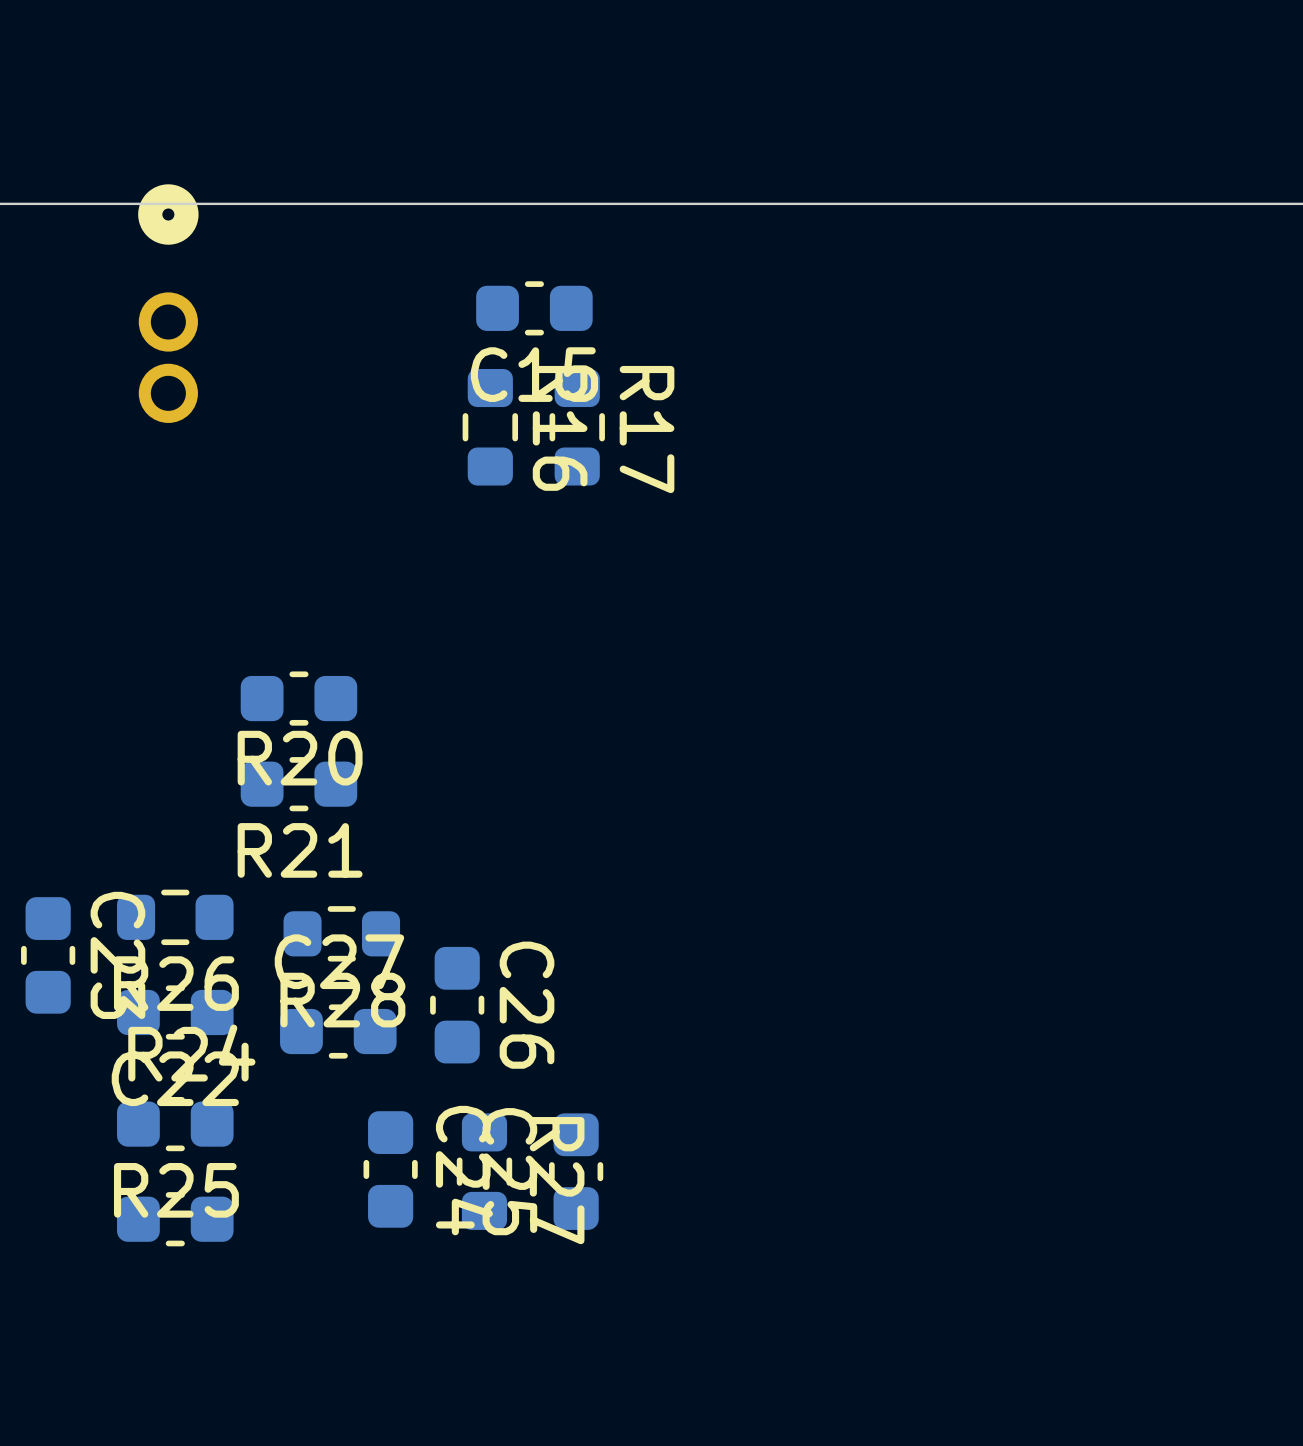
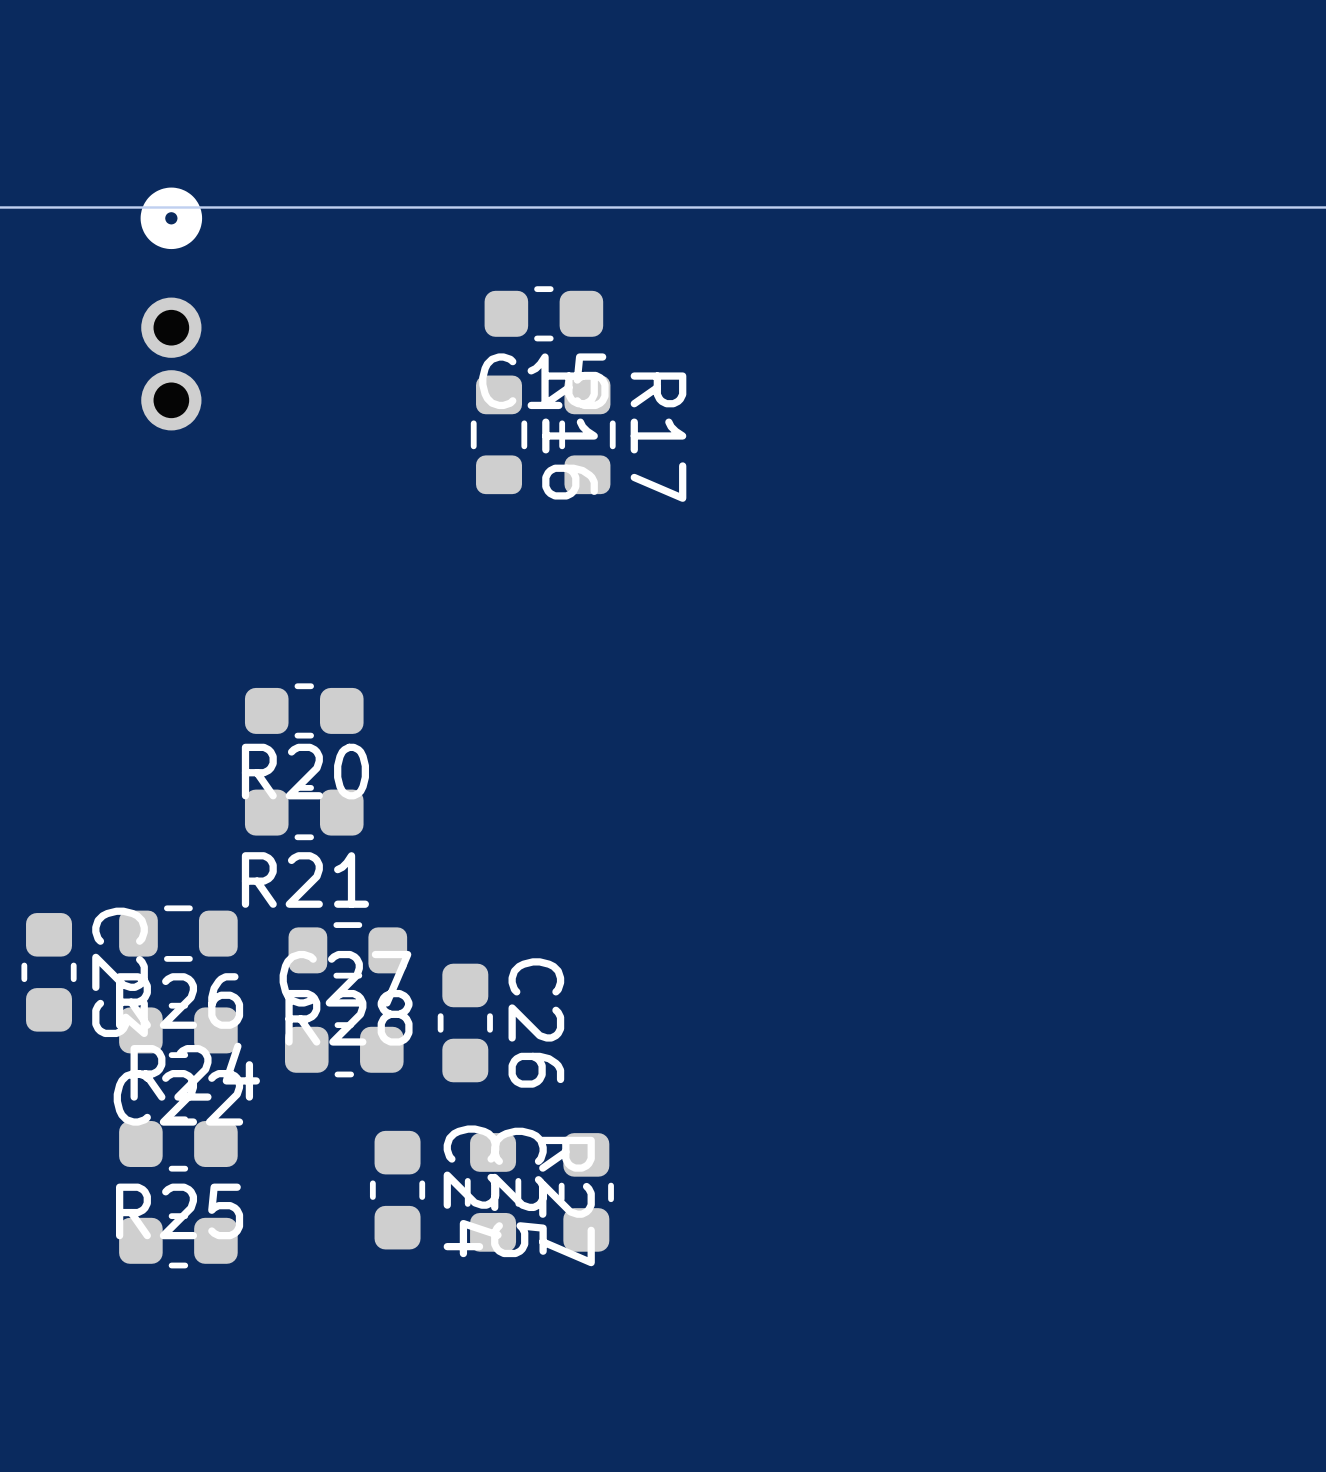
R21 position: (298, 784) -> (304, 812)

